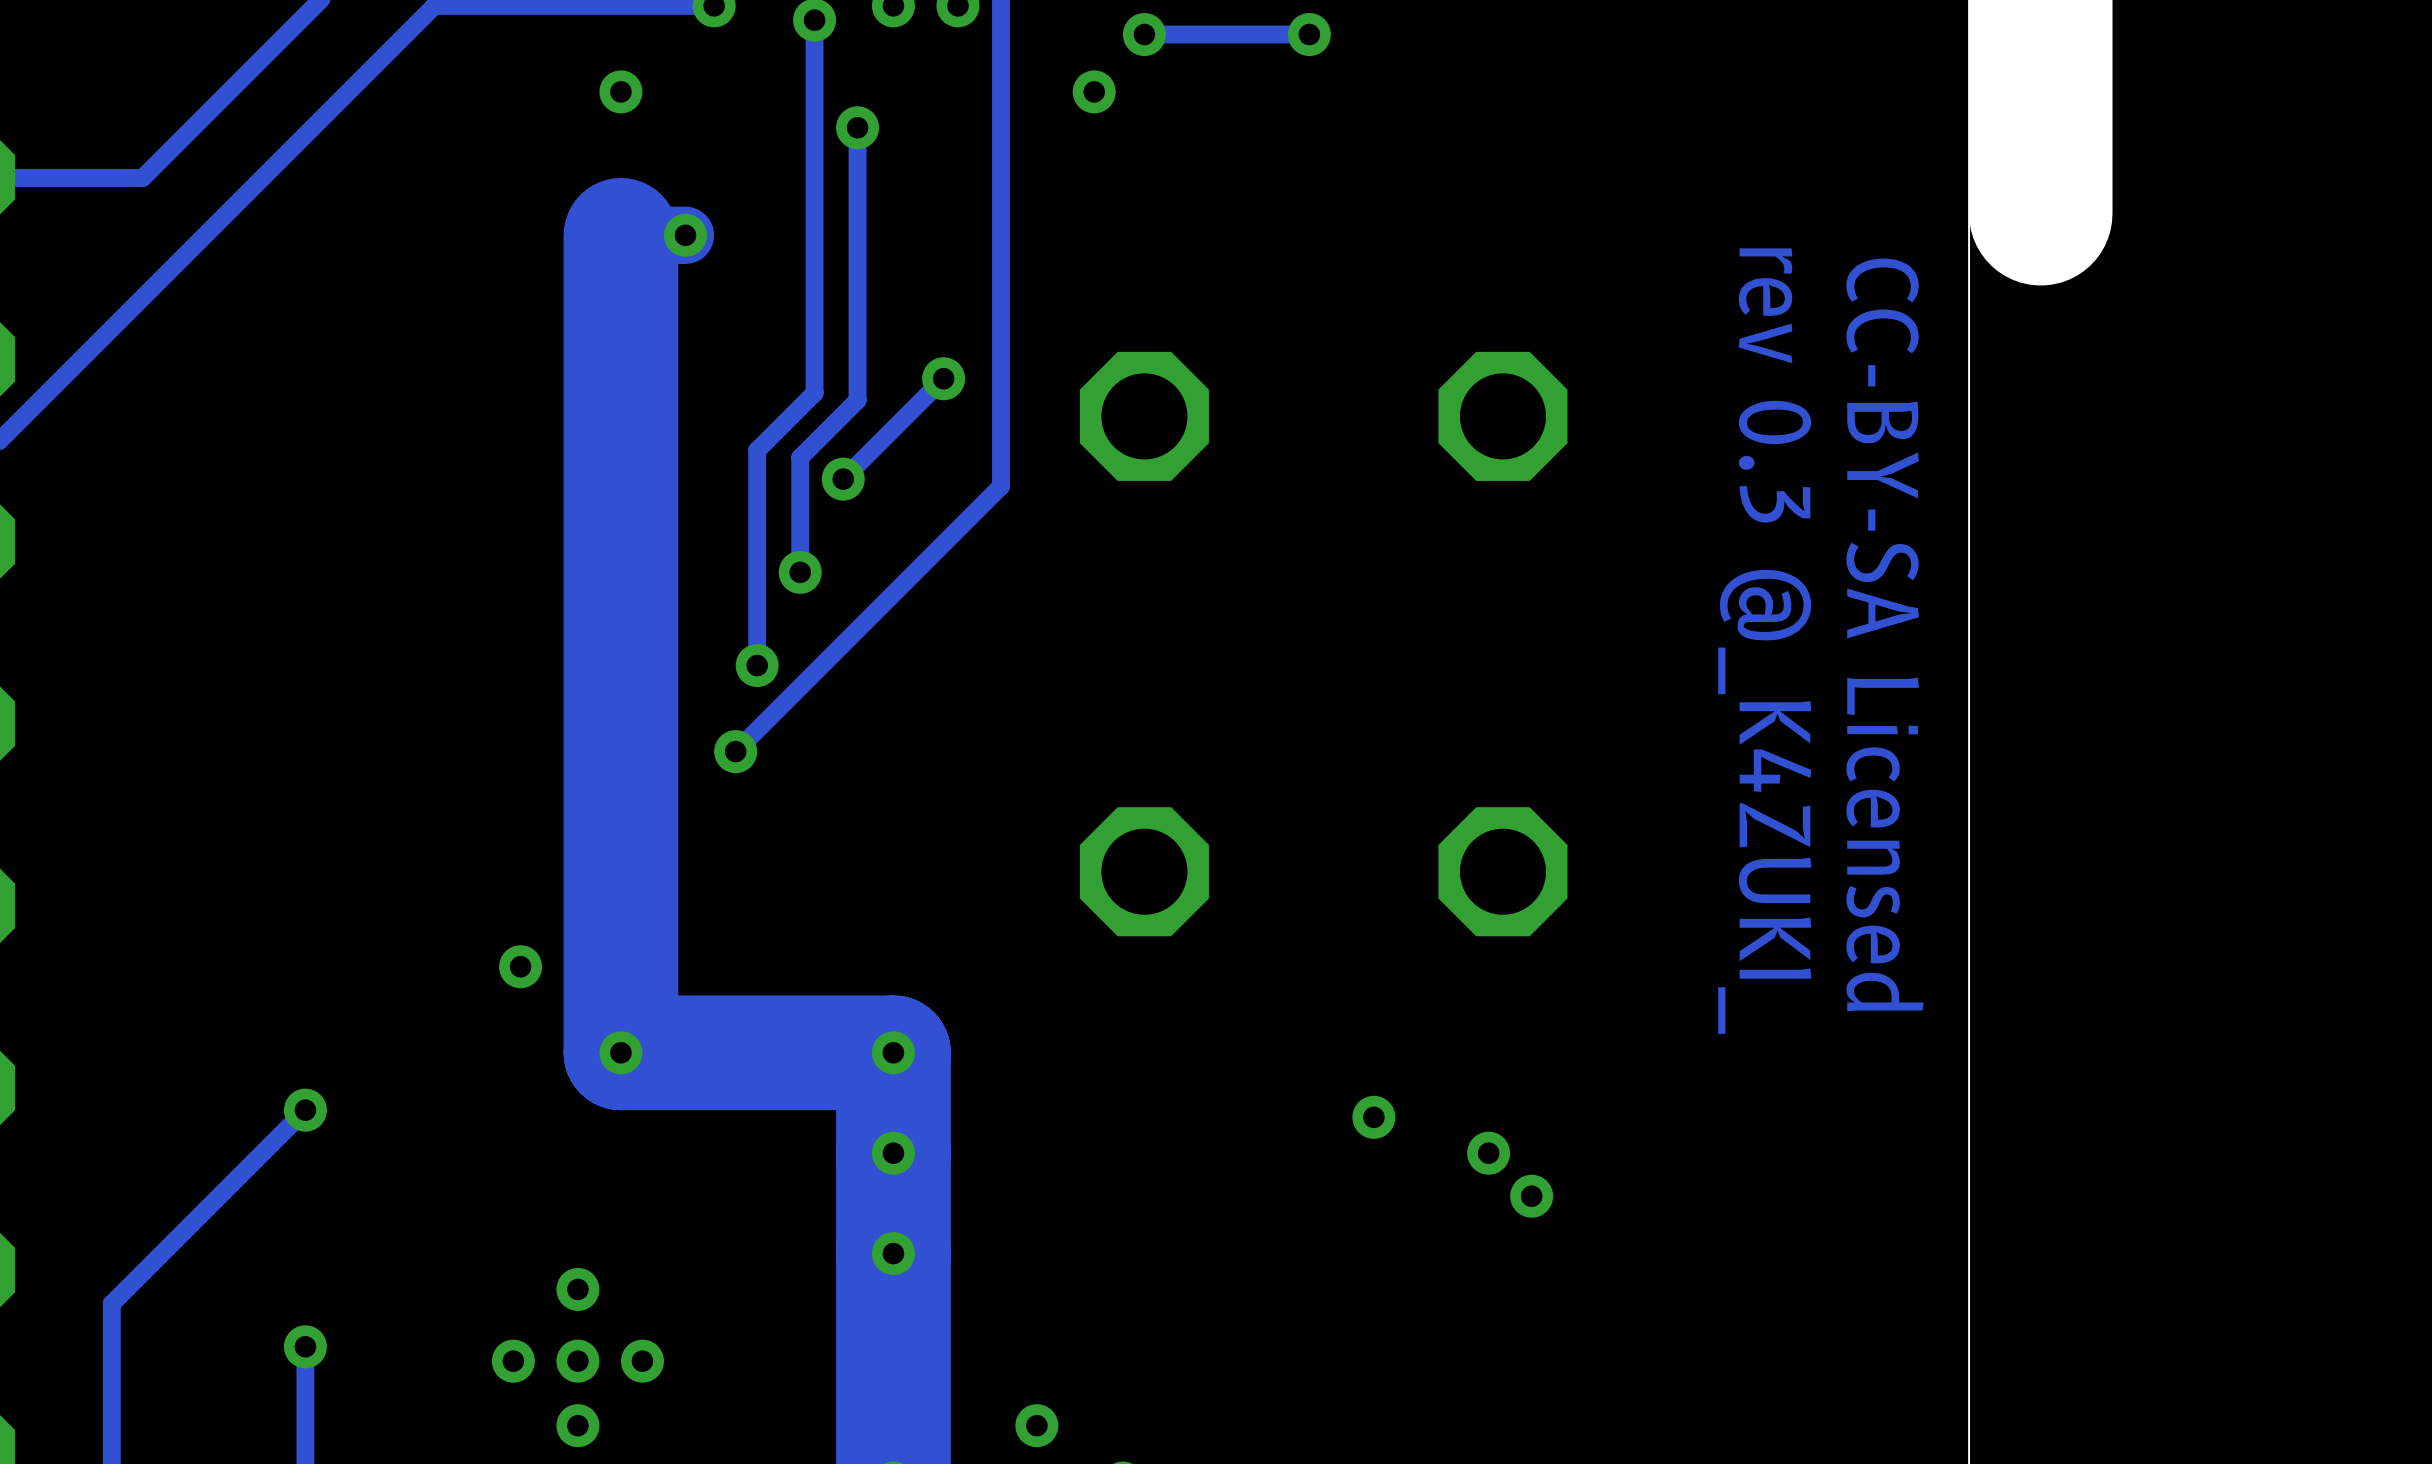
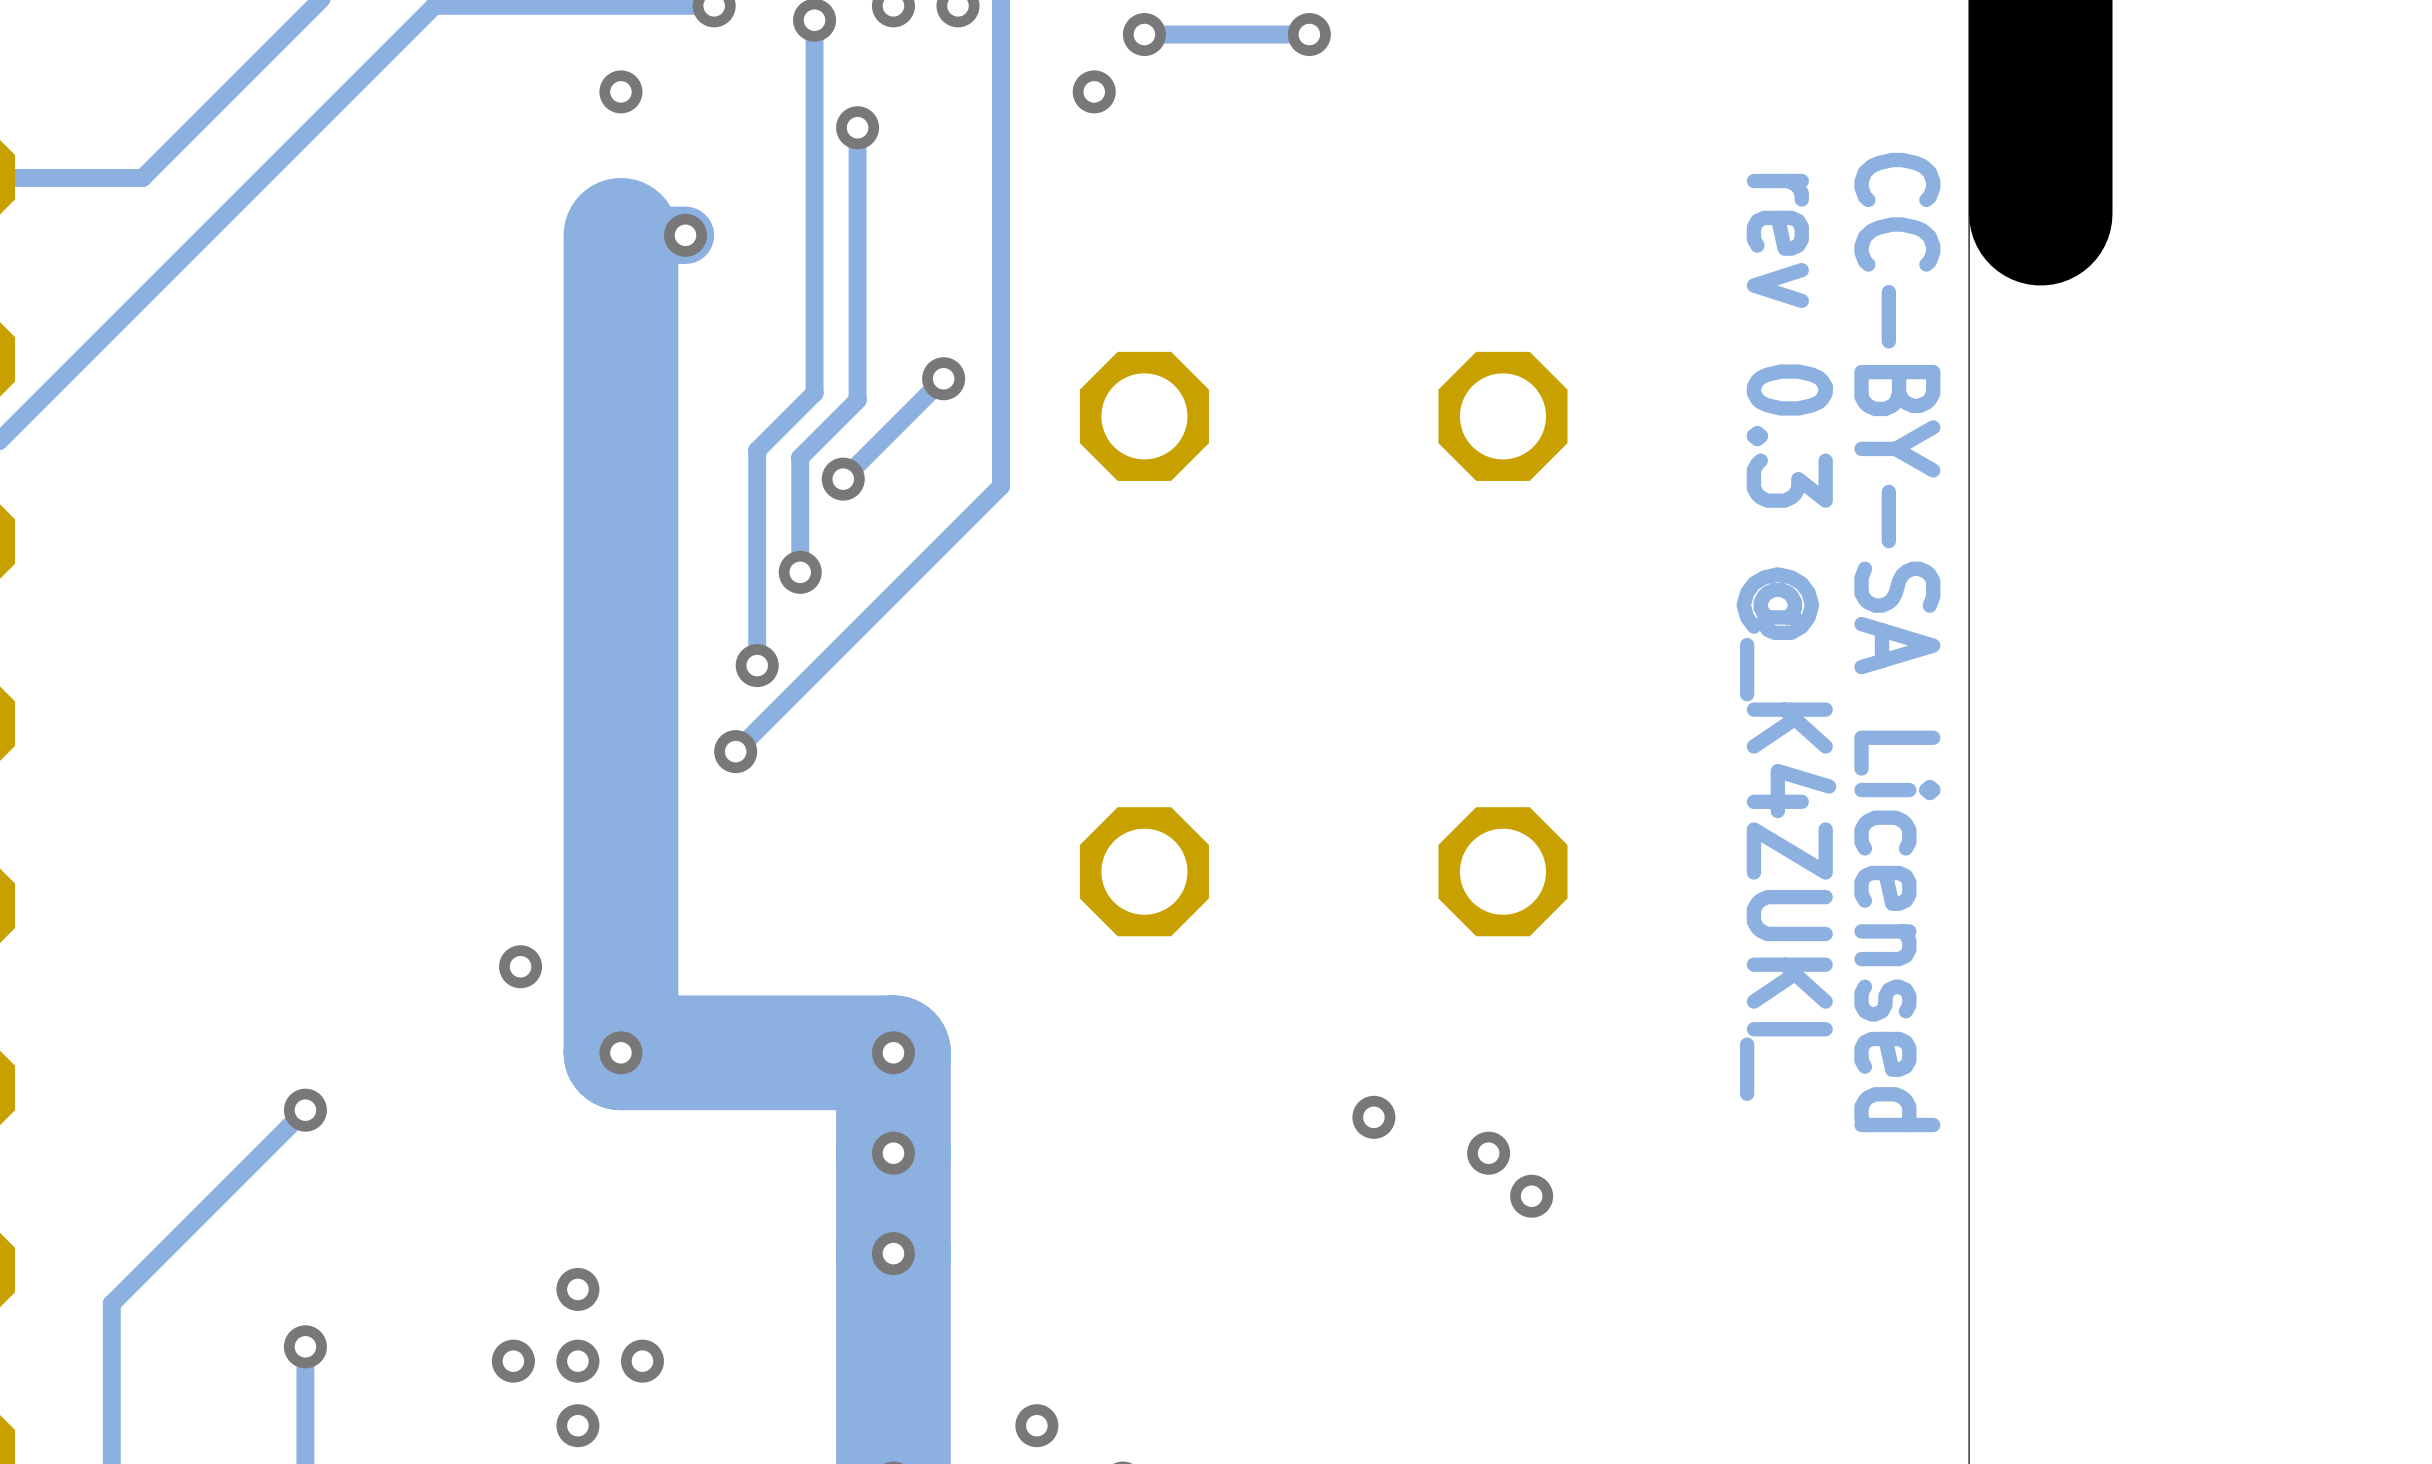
text position: CC-BY-SA Licensed (1884, 634) -> CC-BY-SA Licensed (1897, 642)
text position: rev 0.3 @_K4ZUKI_ (1764, 641) -> rev 0.3 @_K4ZUKI_ (1786, 637)

